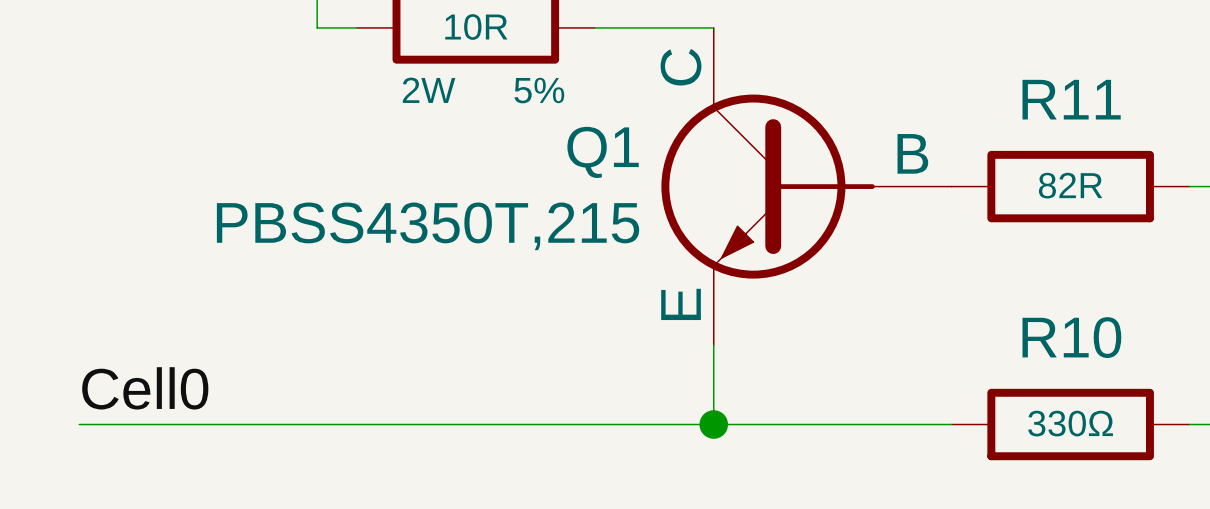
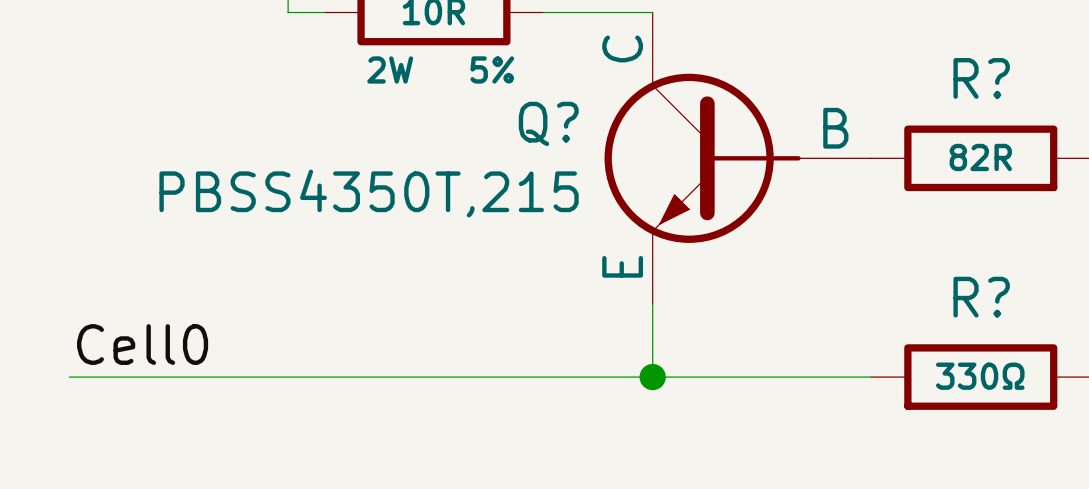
R11 name: R11 (1071, 99) -> R? (981, 78)
Q1 name: Q1 (603, 152) -> Q? (548, 123)
R10 name: R10 (1071, 337) -> R? (981, 297)

